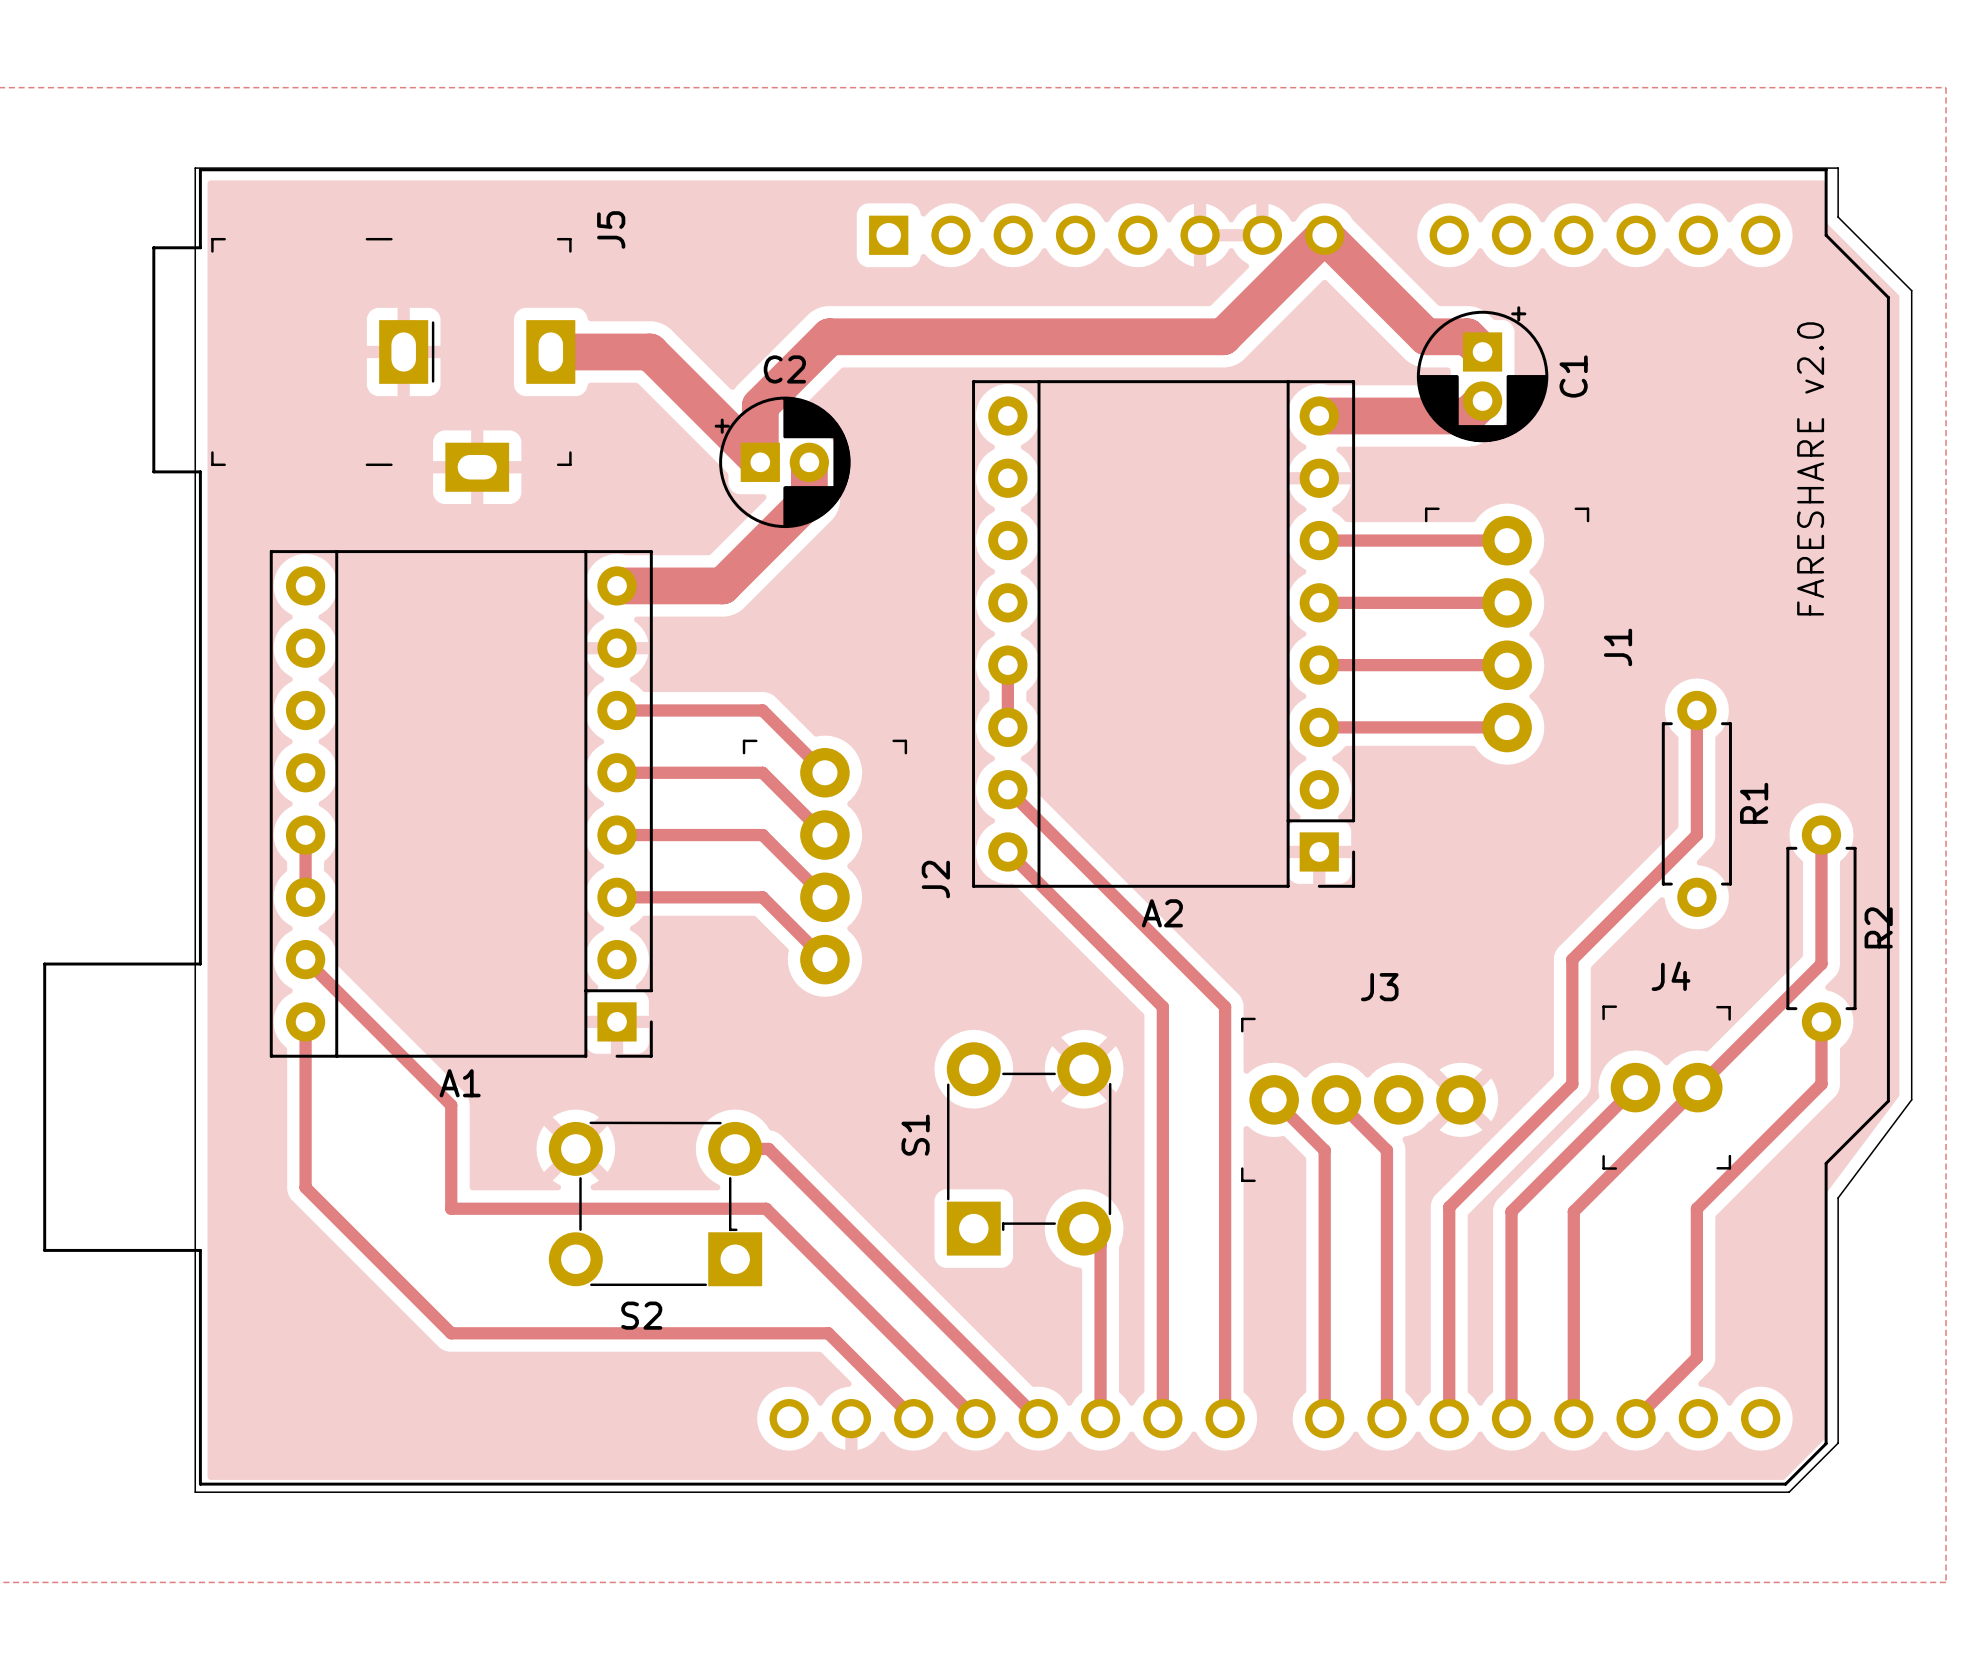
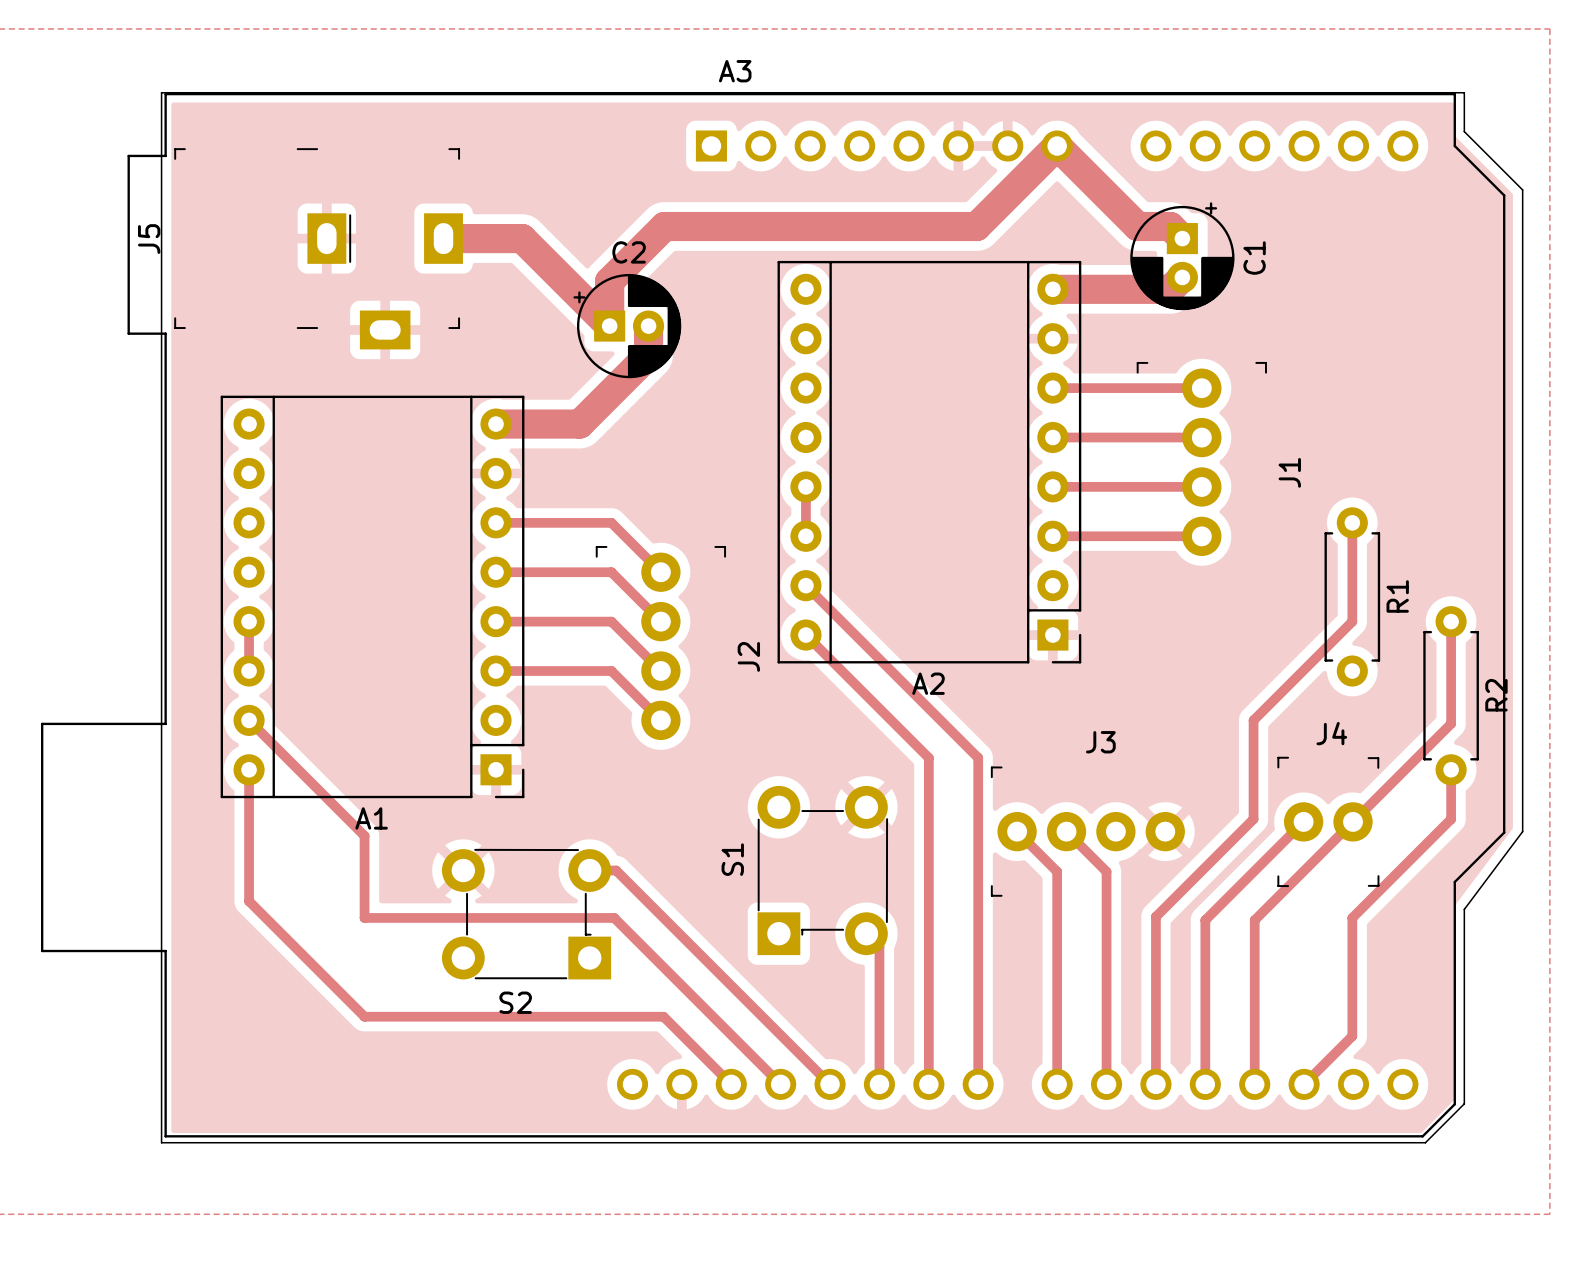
A3 name: none -> A3 (735, 71)
J5 name position: J5 (611, 229) -> J5 (149, 239)
text: FARESHARE v2.0 (1810, 468) -> none

